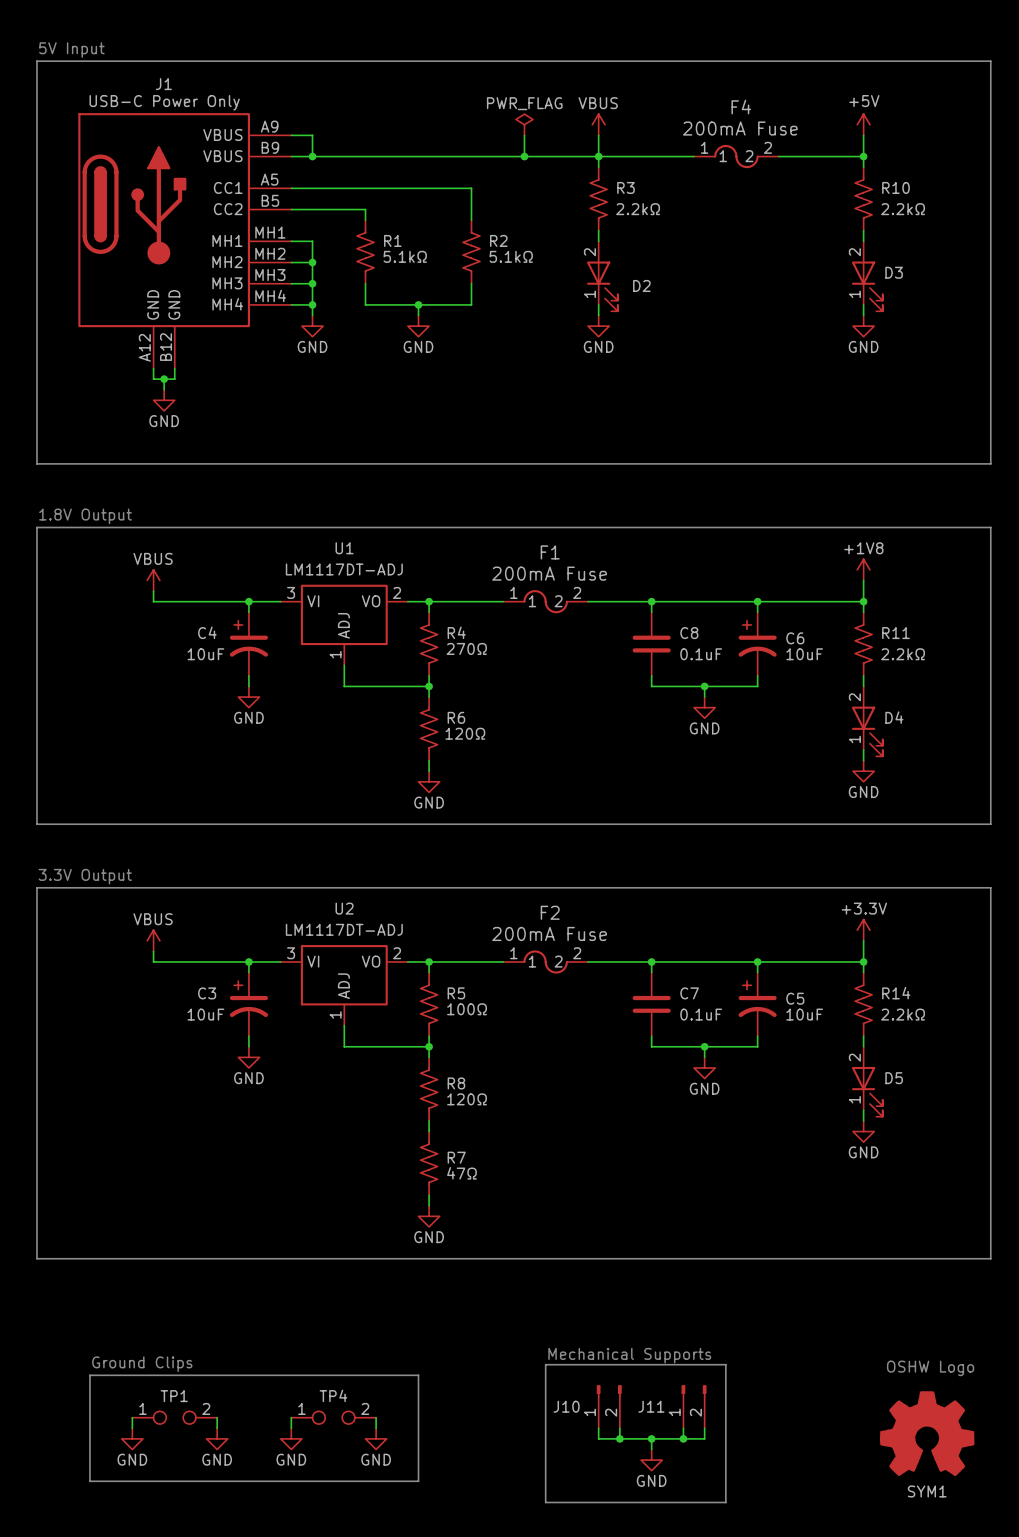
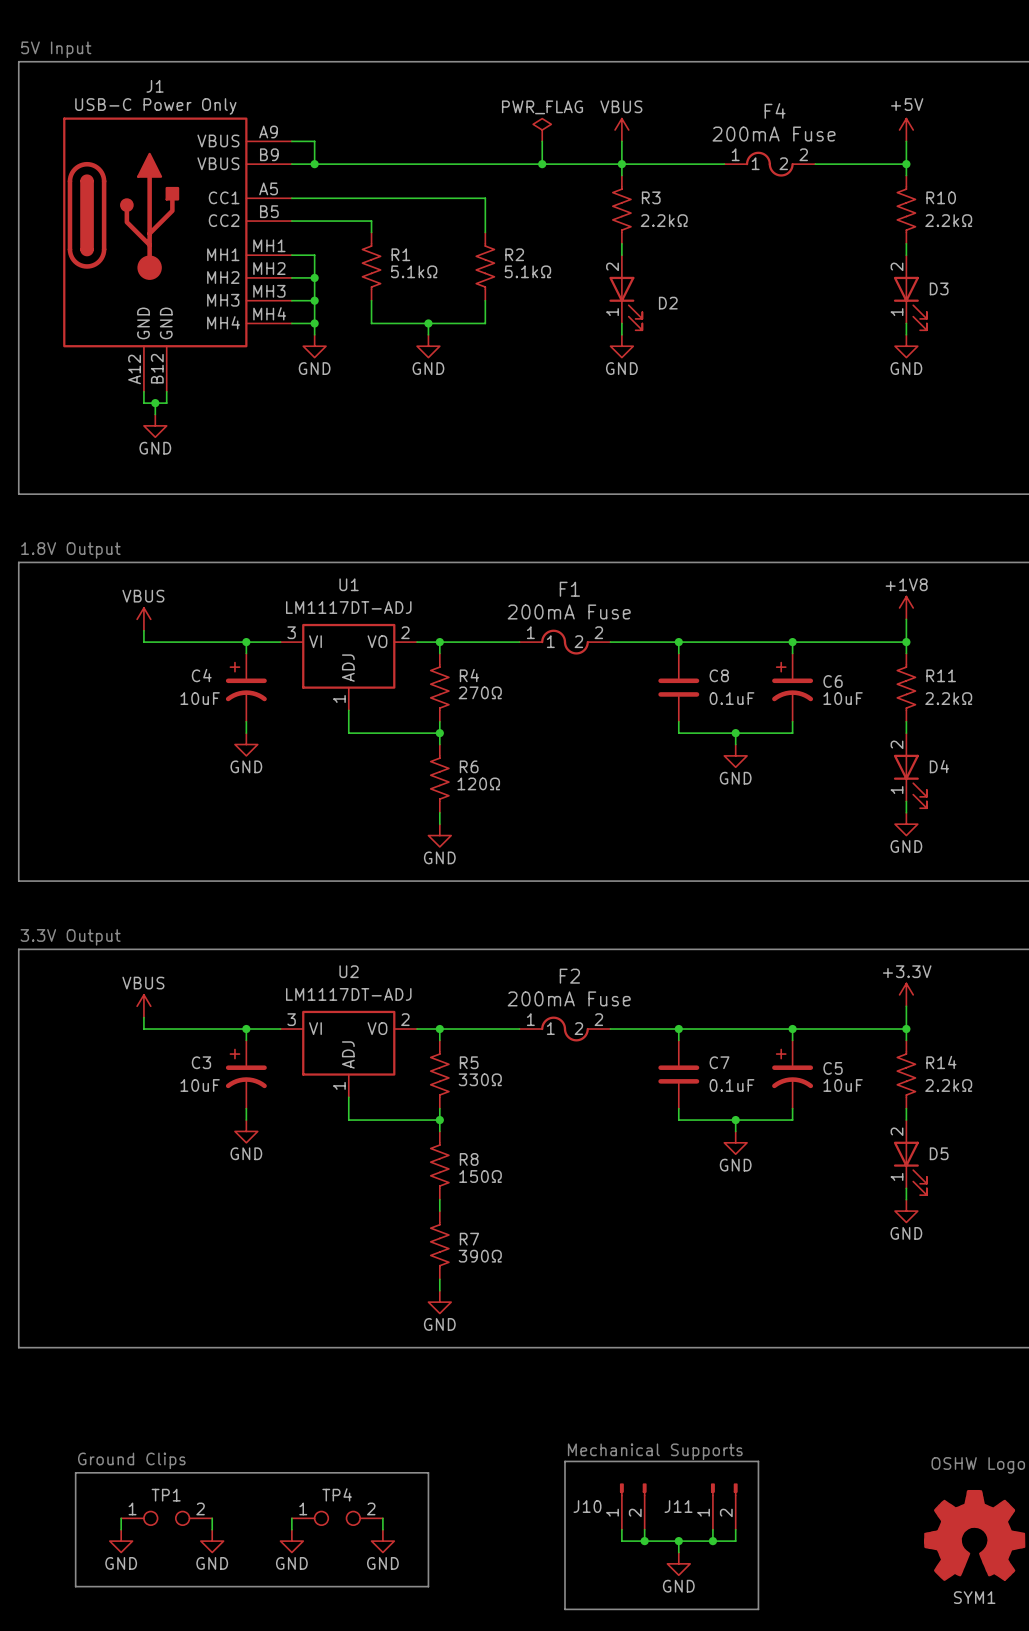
R5 value: 100Ω (467, 1009) -> 330Ω (480, 1079)
R8 value: 120Ω (467, 1099) -> 150Ω (480, 1176)
R7 value: 47Ω (461, 1173) -> 390Ω (480, 1256)

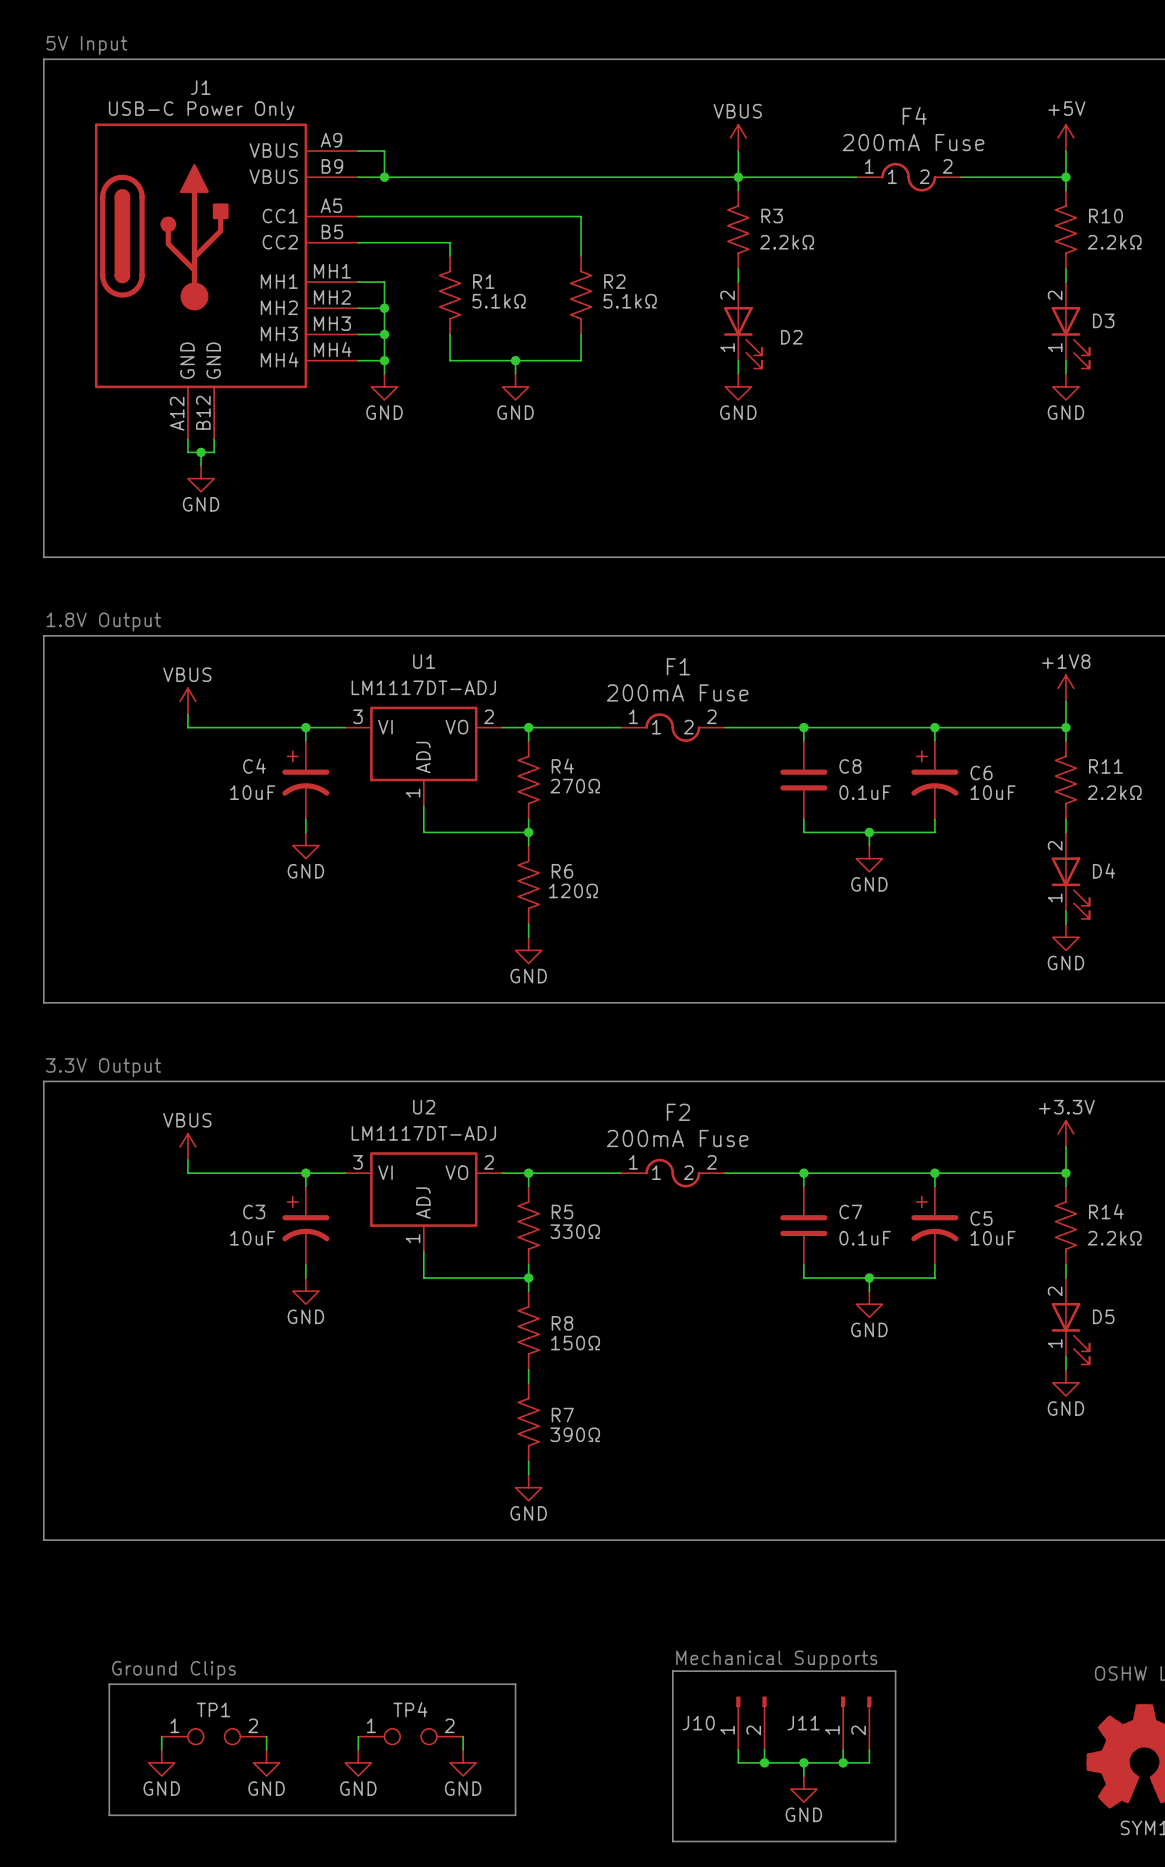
power symbol: PWR_FLAG (542, 130) -> none
wire: (542, 141) (542, 164) -> none
junction: (542, 164) -> none

